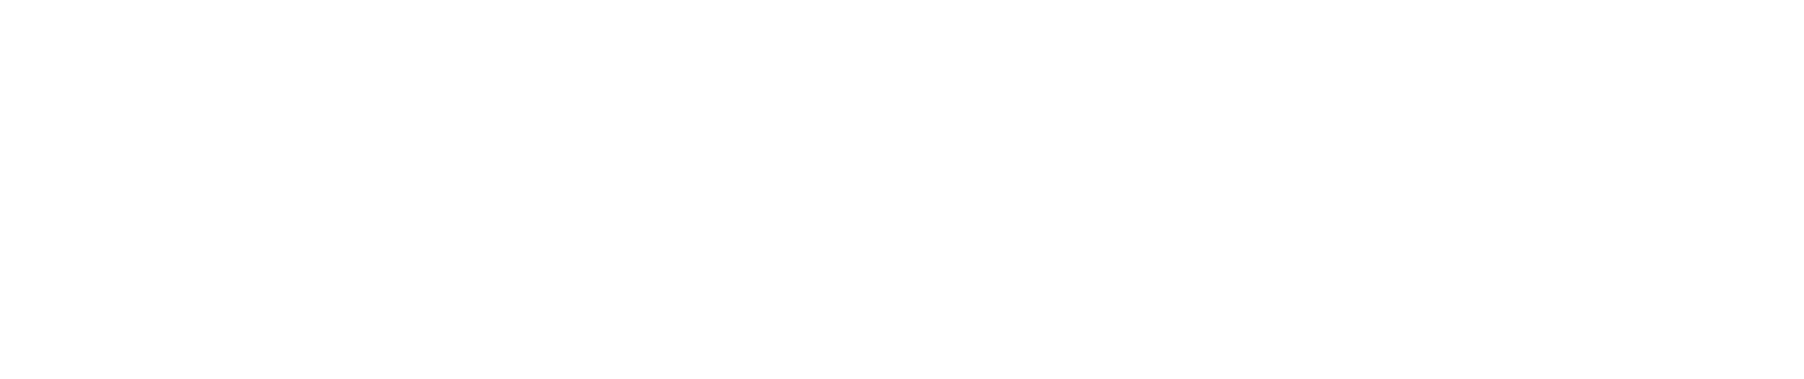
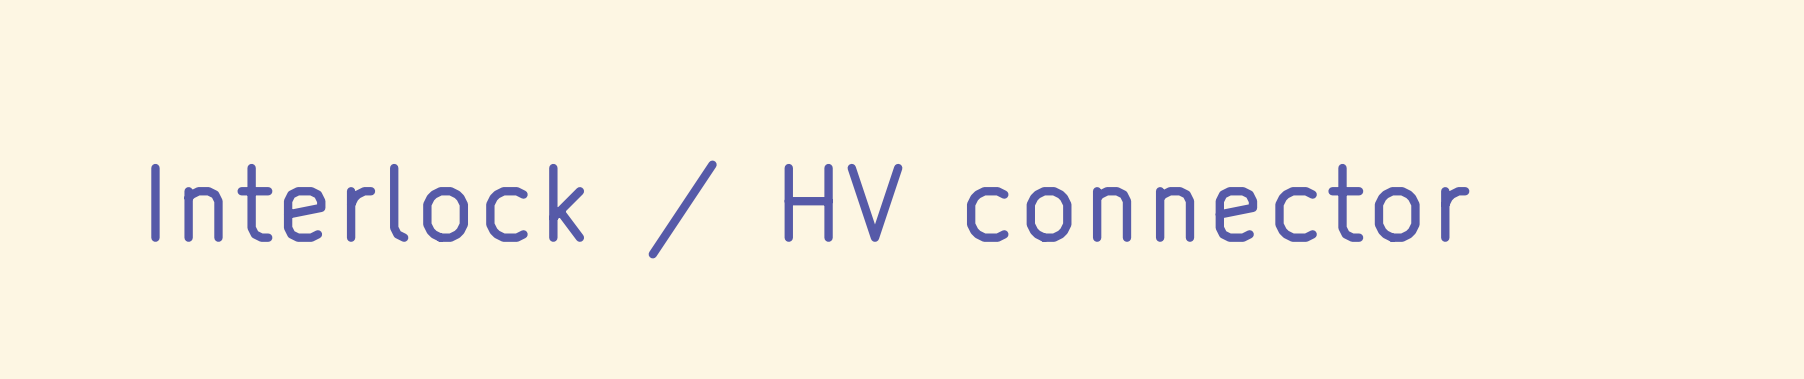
text: none -> Interlock / HV connector (810, 209)

